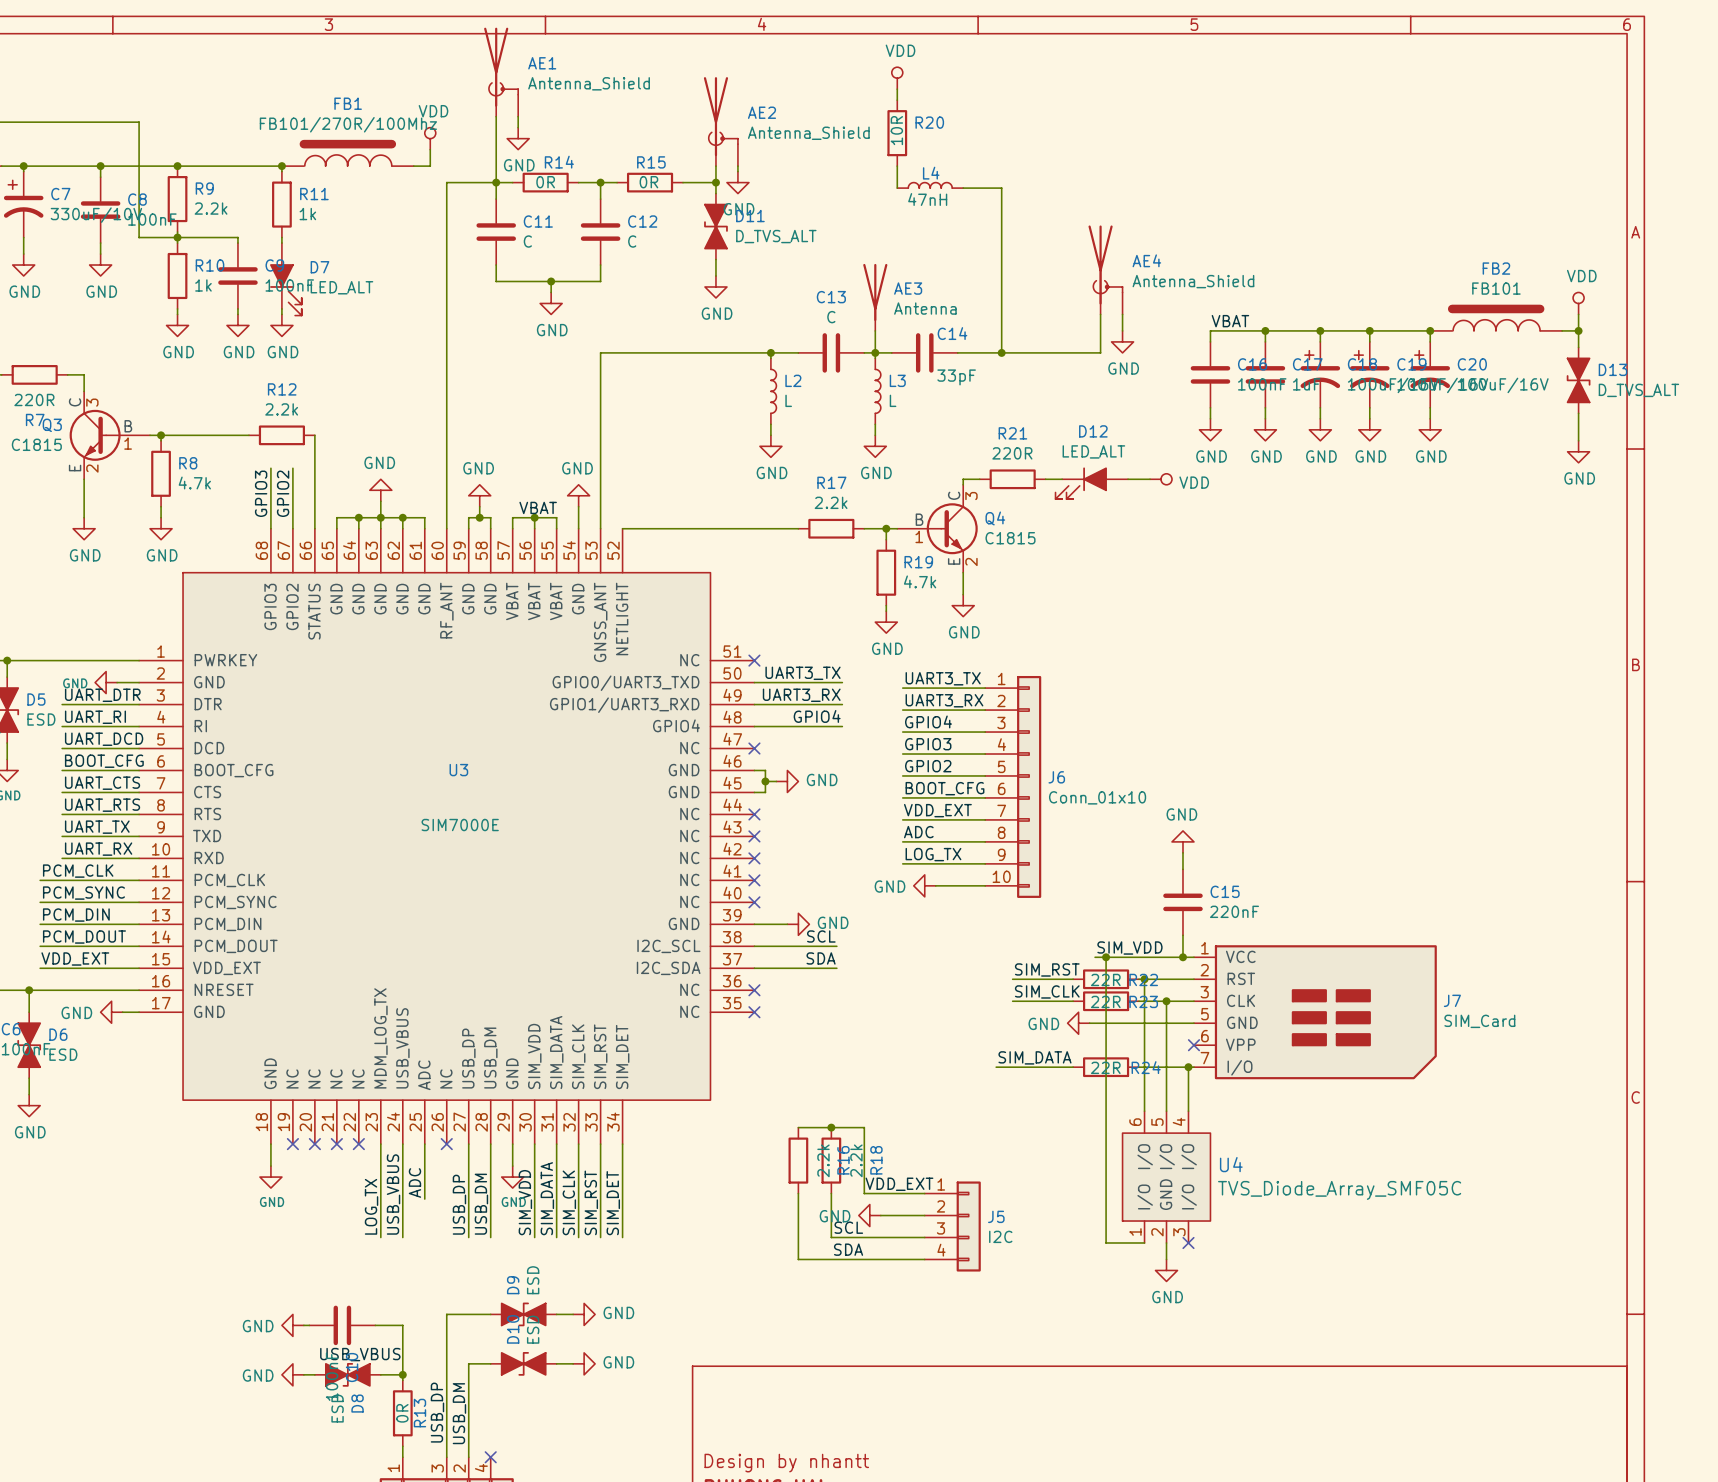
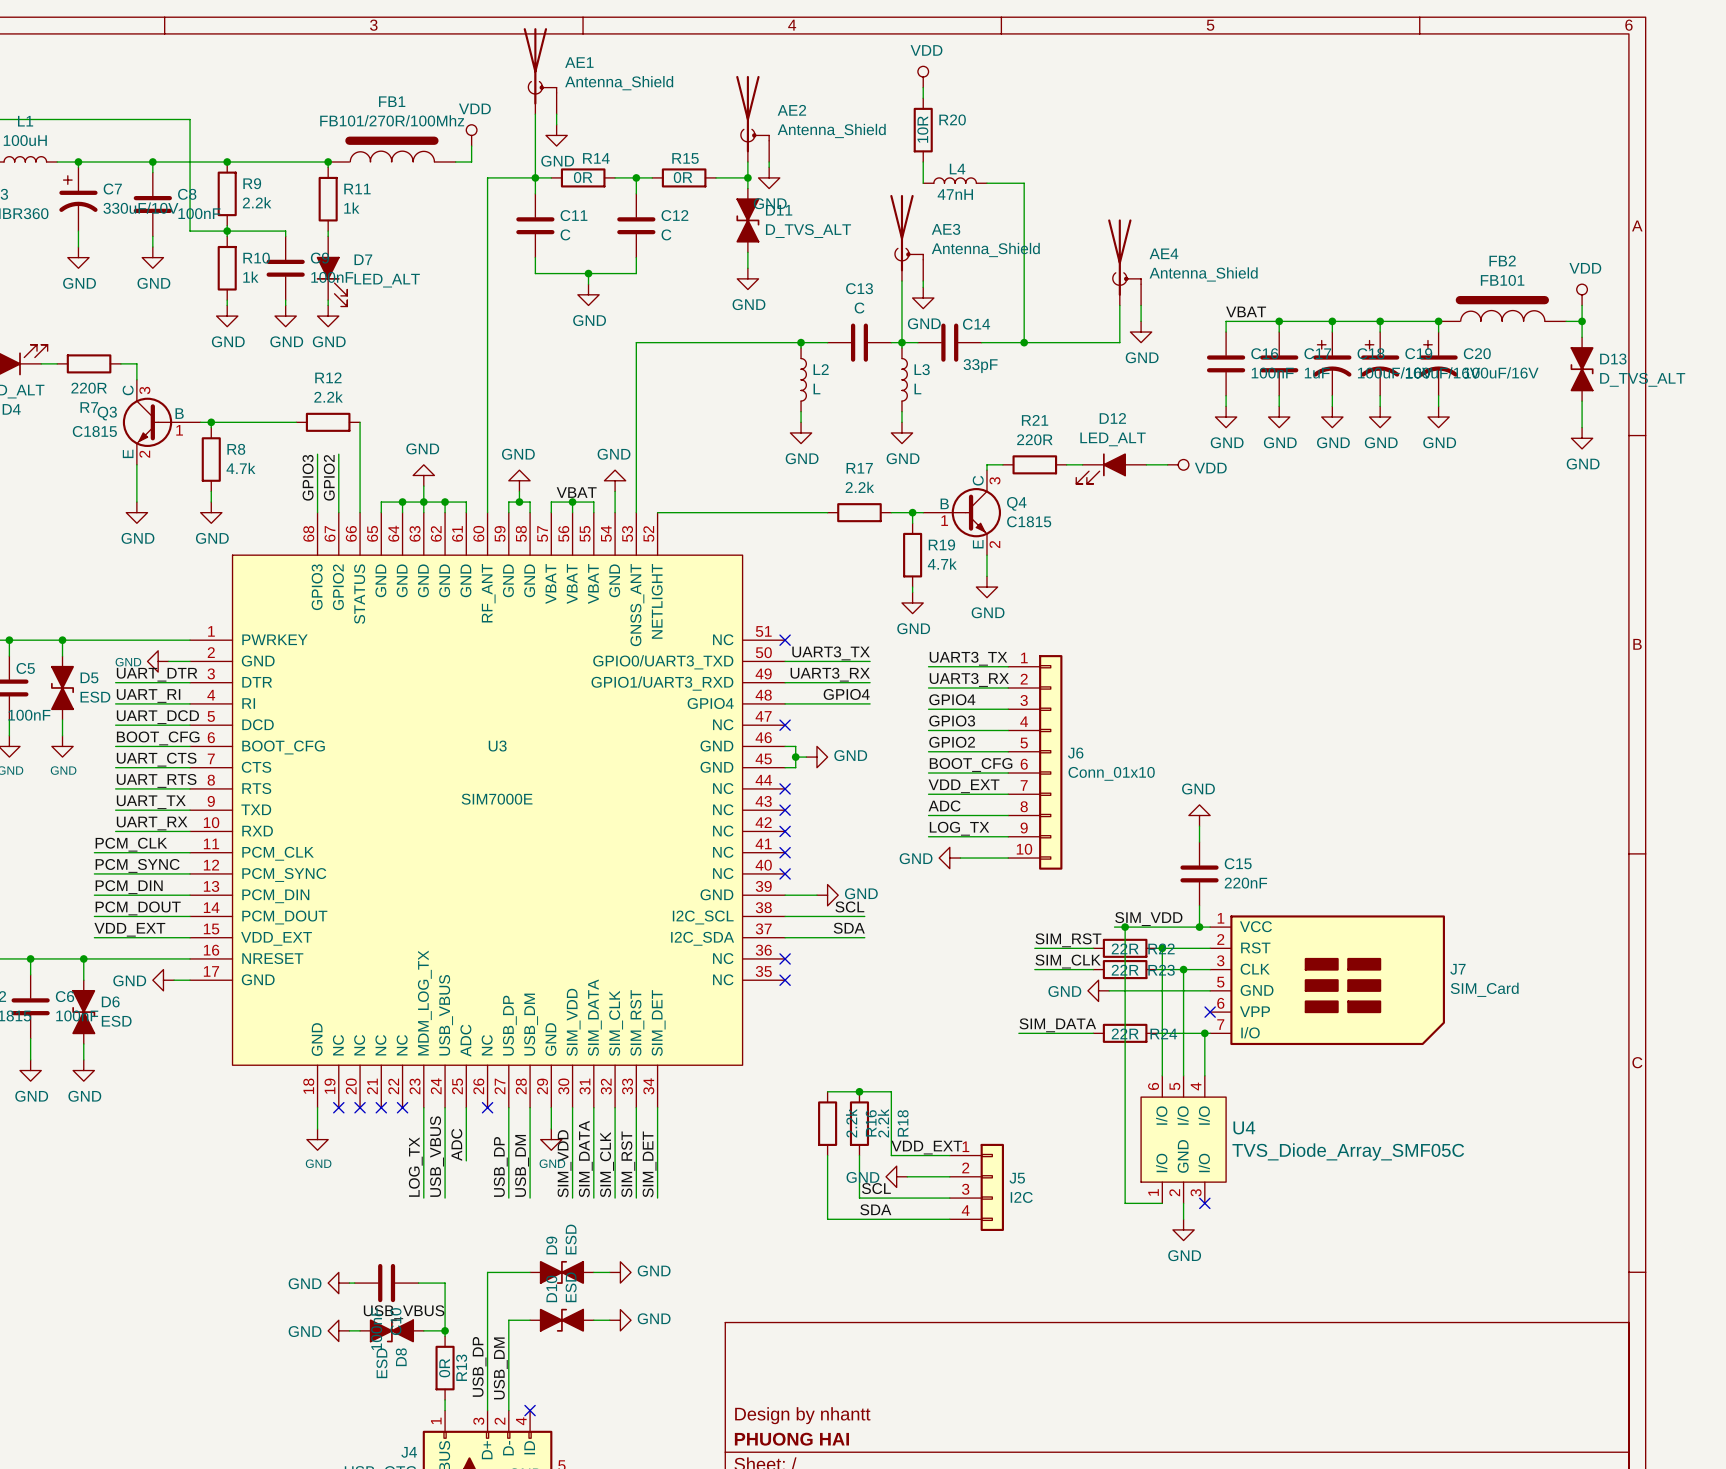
AE3 symbol: [863, 263, 888, 331] -> [890, 194, 924, 282]
wire: none -> (923, 281) (923, 287)
power symbol: none -> GND (923, 298)
AE3 value: Antenna (925, 308) -> Antenna_Shield (985, 249)

